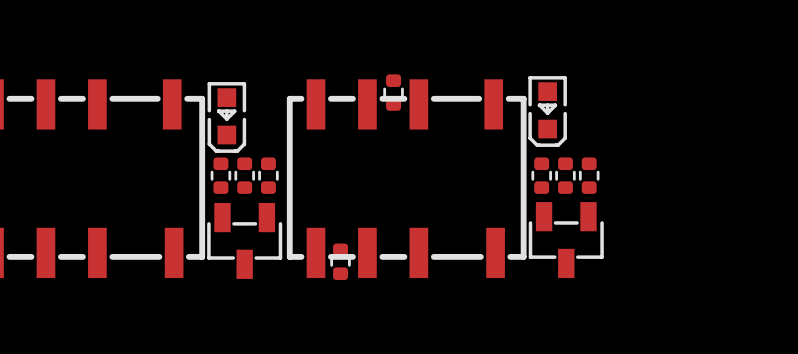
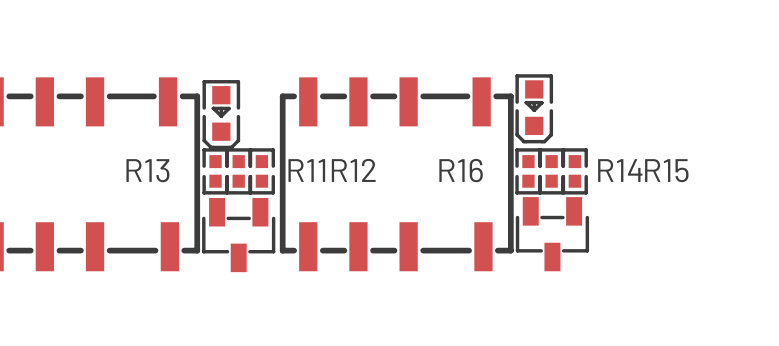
part: (393, 92) -> none
part: (220, 175) -> none
R11: none -> (215, 171)
part: (244, 175) -> none
R13: none -> (238, 171)
part: (268, 175) -> none
R12: none -> (261, 171)
part: (541, 175) -> none
R14: none -> (528, 171)
part: (565, 175) -> none
R16: none -> (551, 171)
part: (589, 175) -> none
R15: none -> (574, 171)
part: (340, 261) -> none

